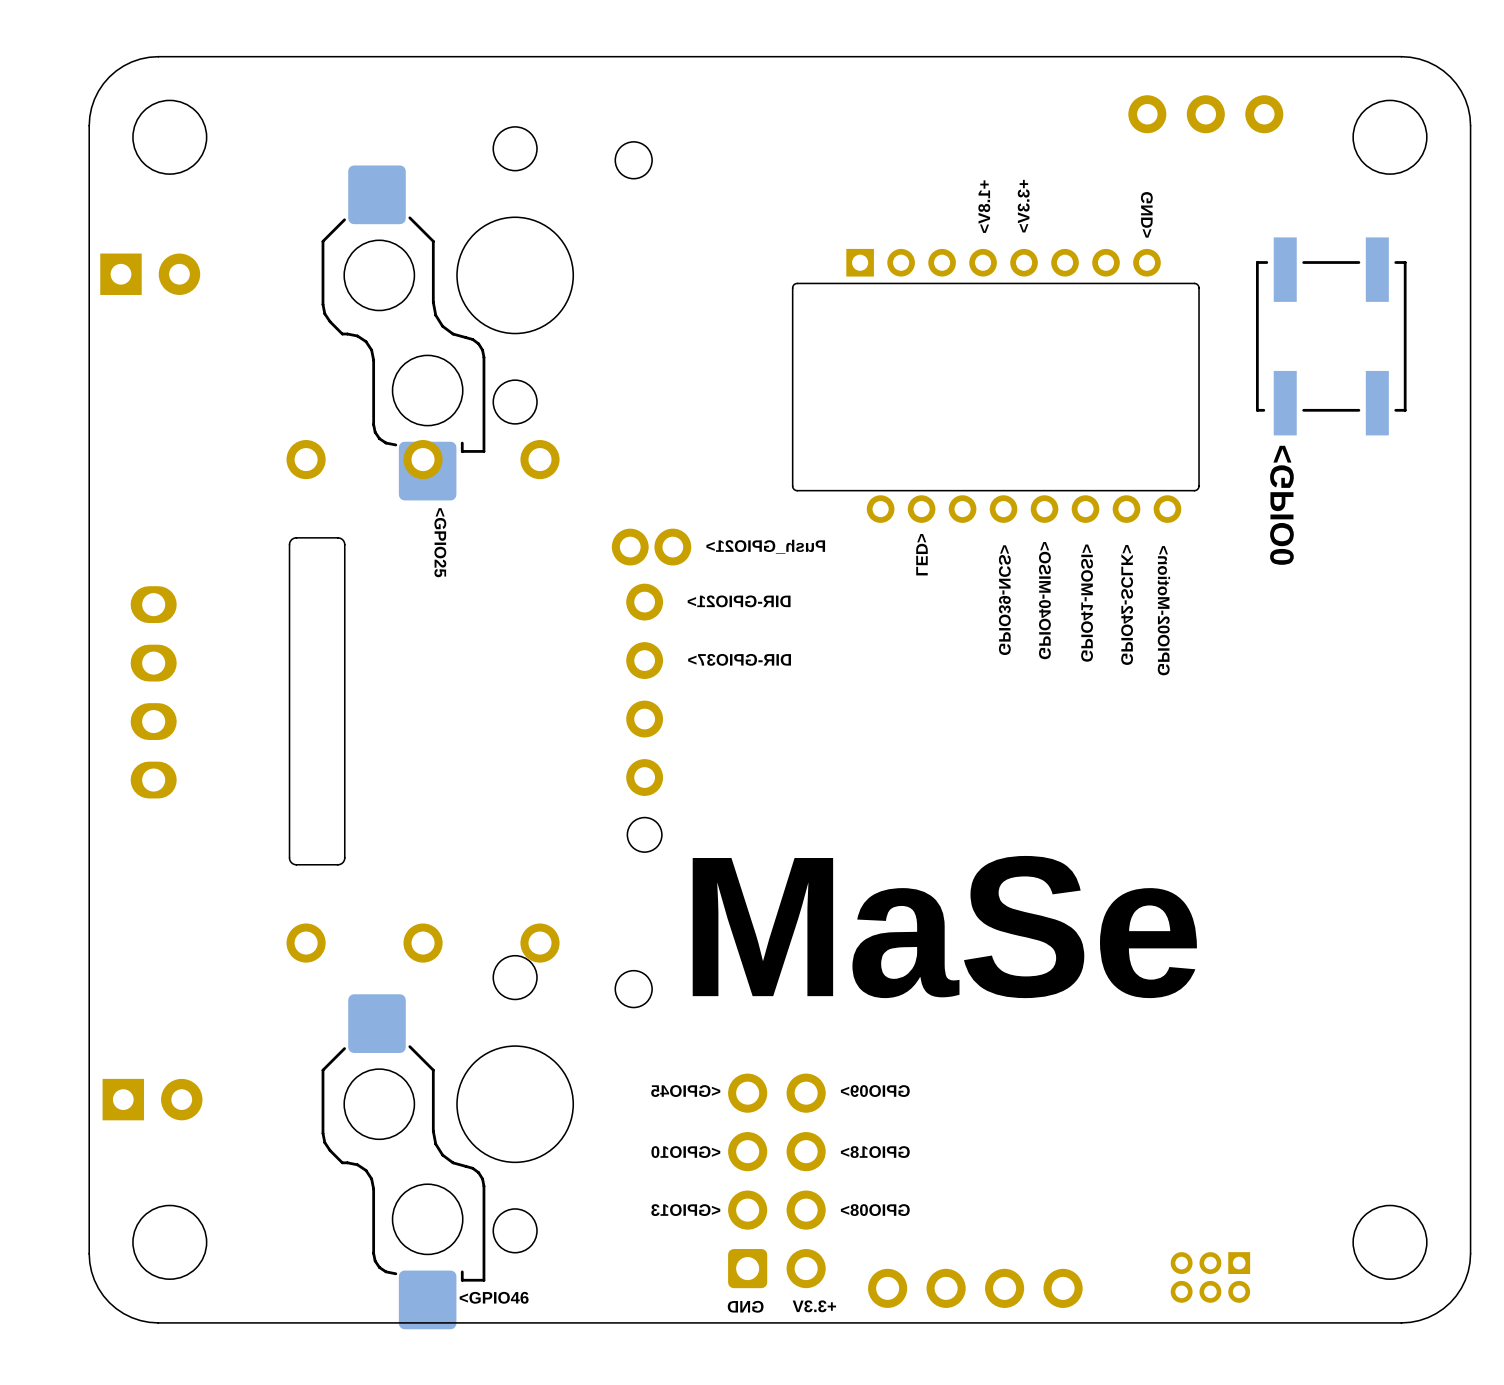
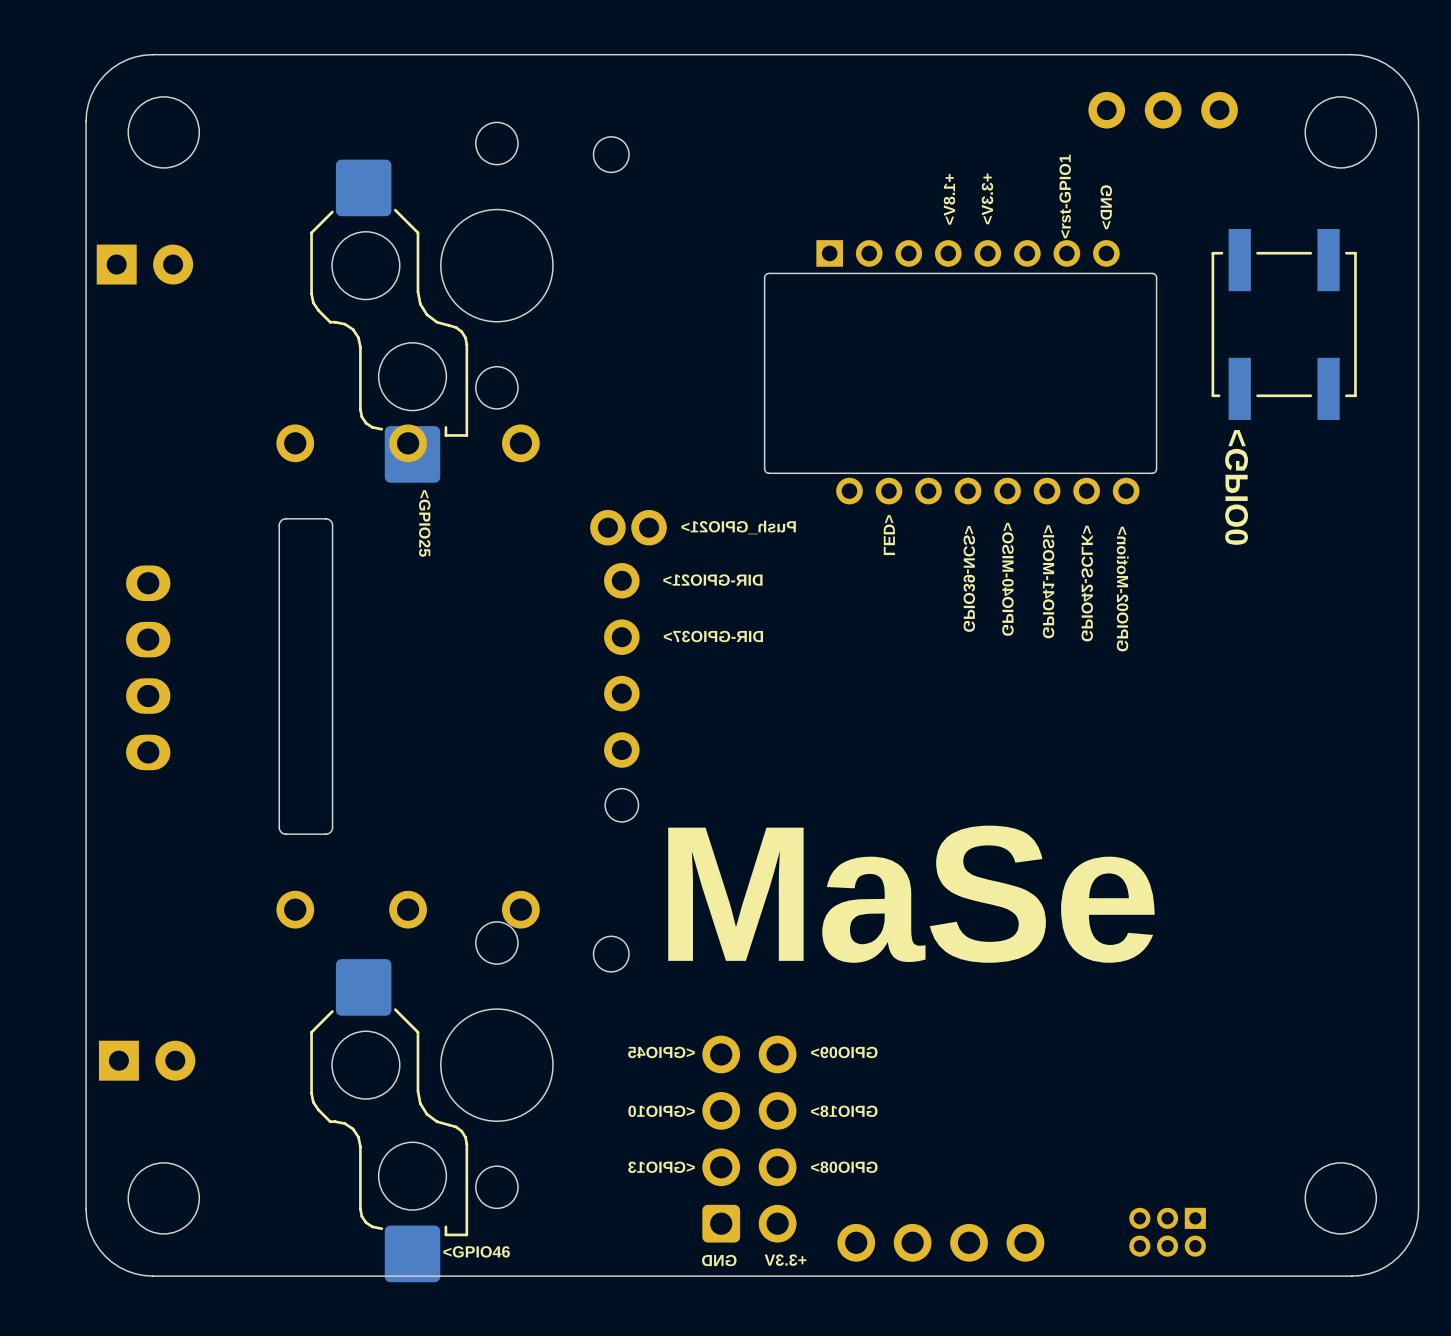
text: none -> <rst-GPIO1 (1065, 196)

